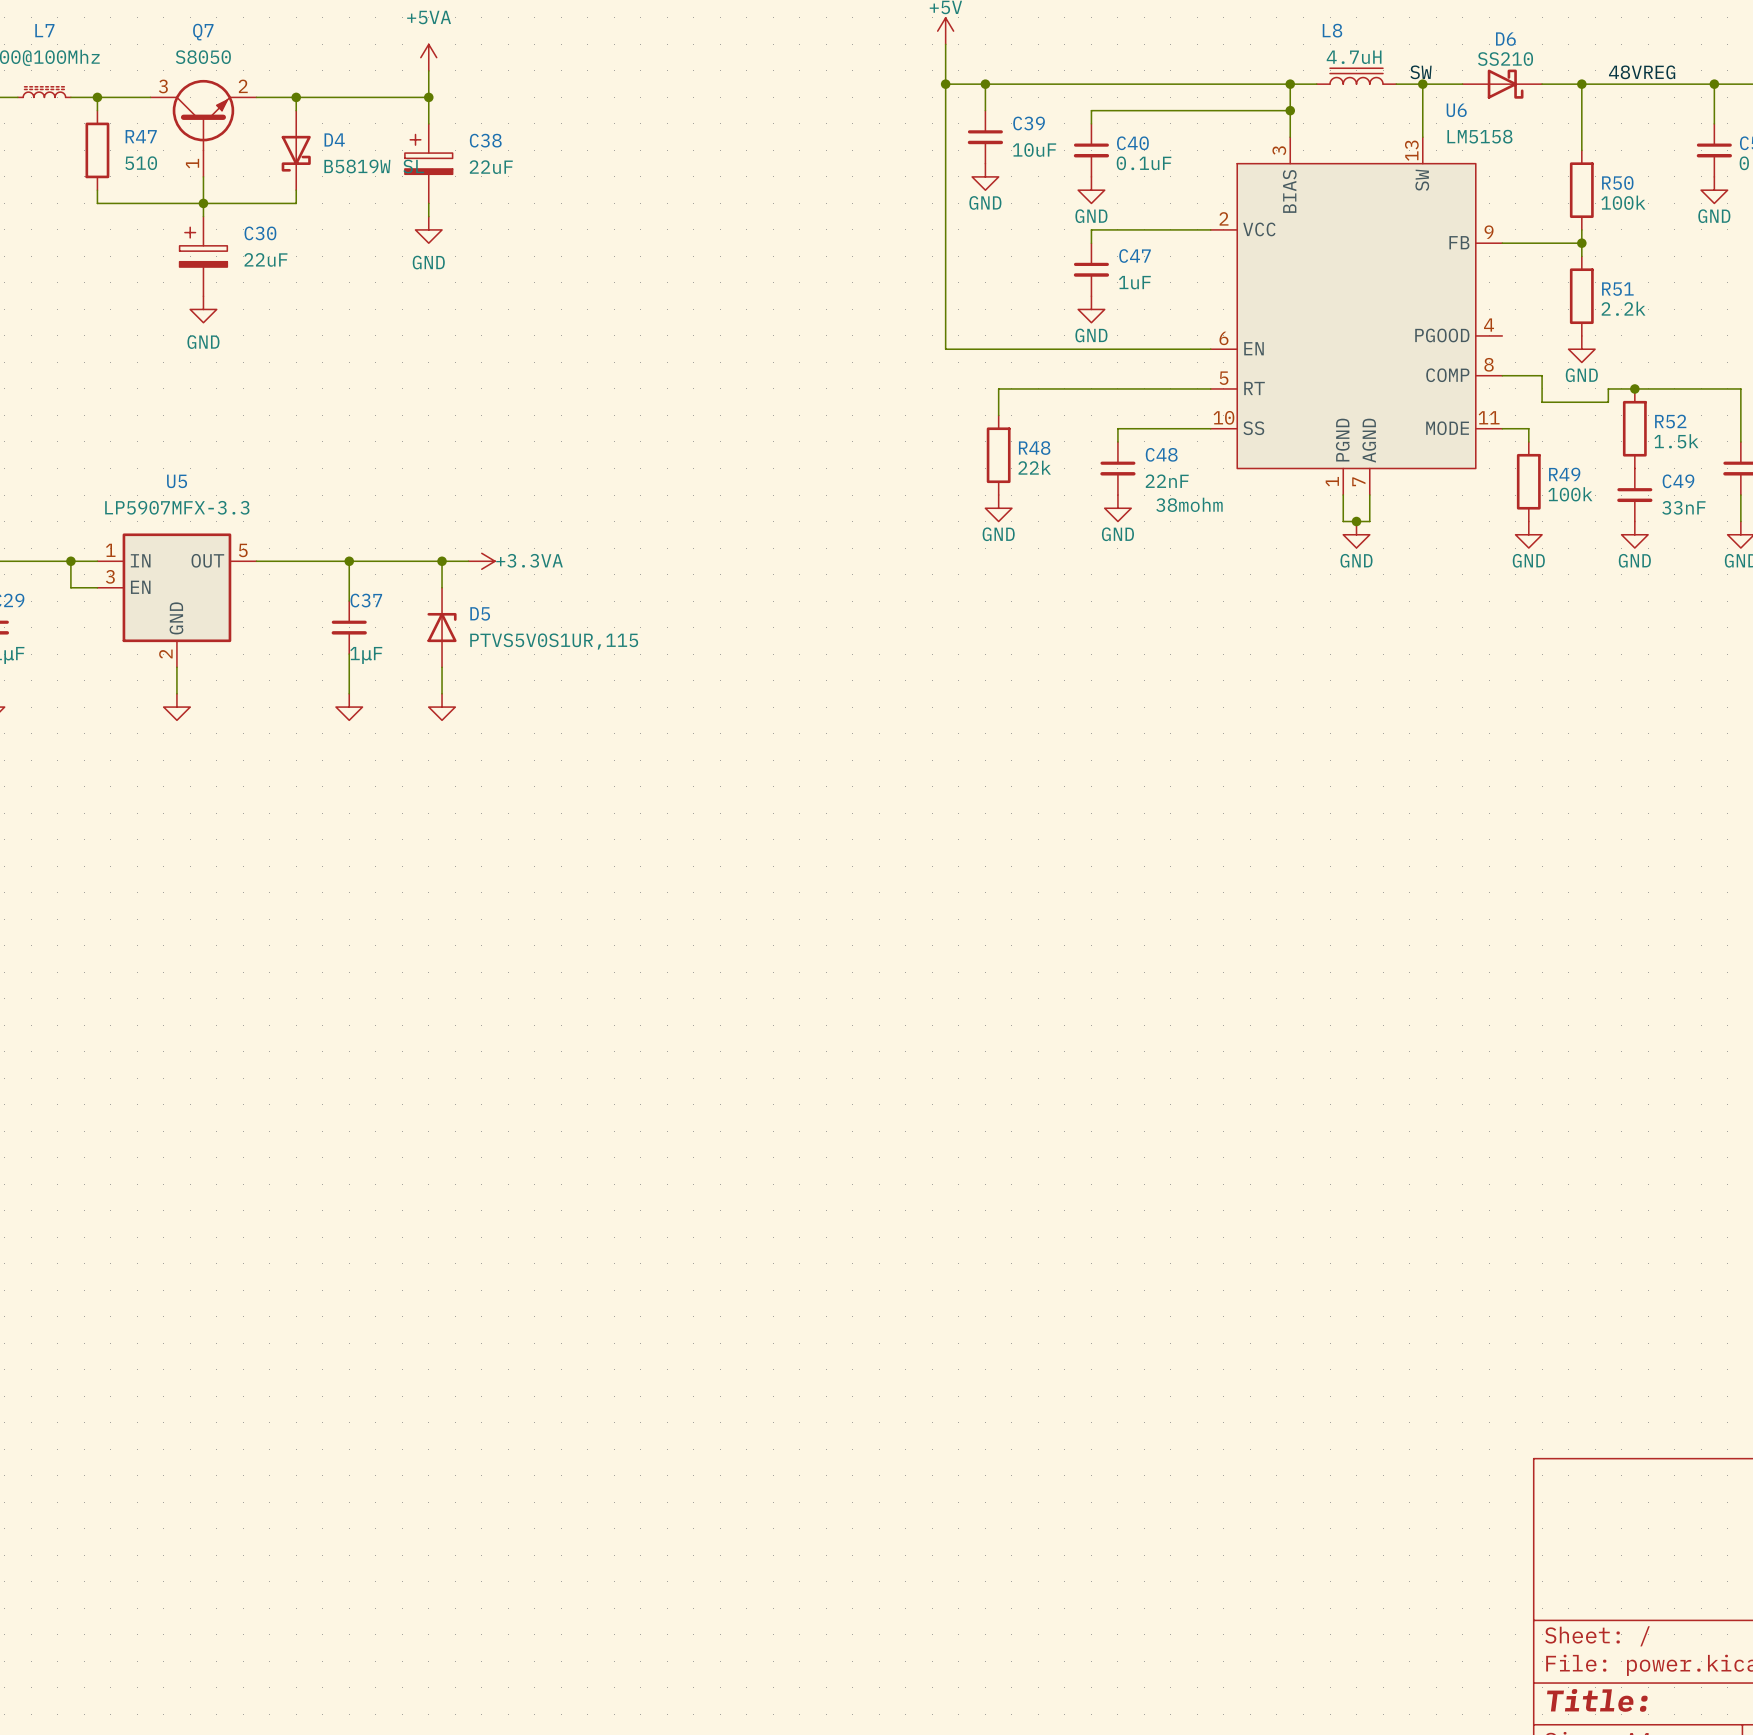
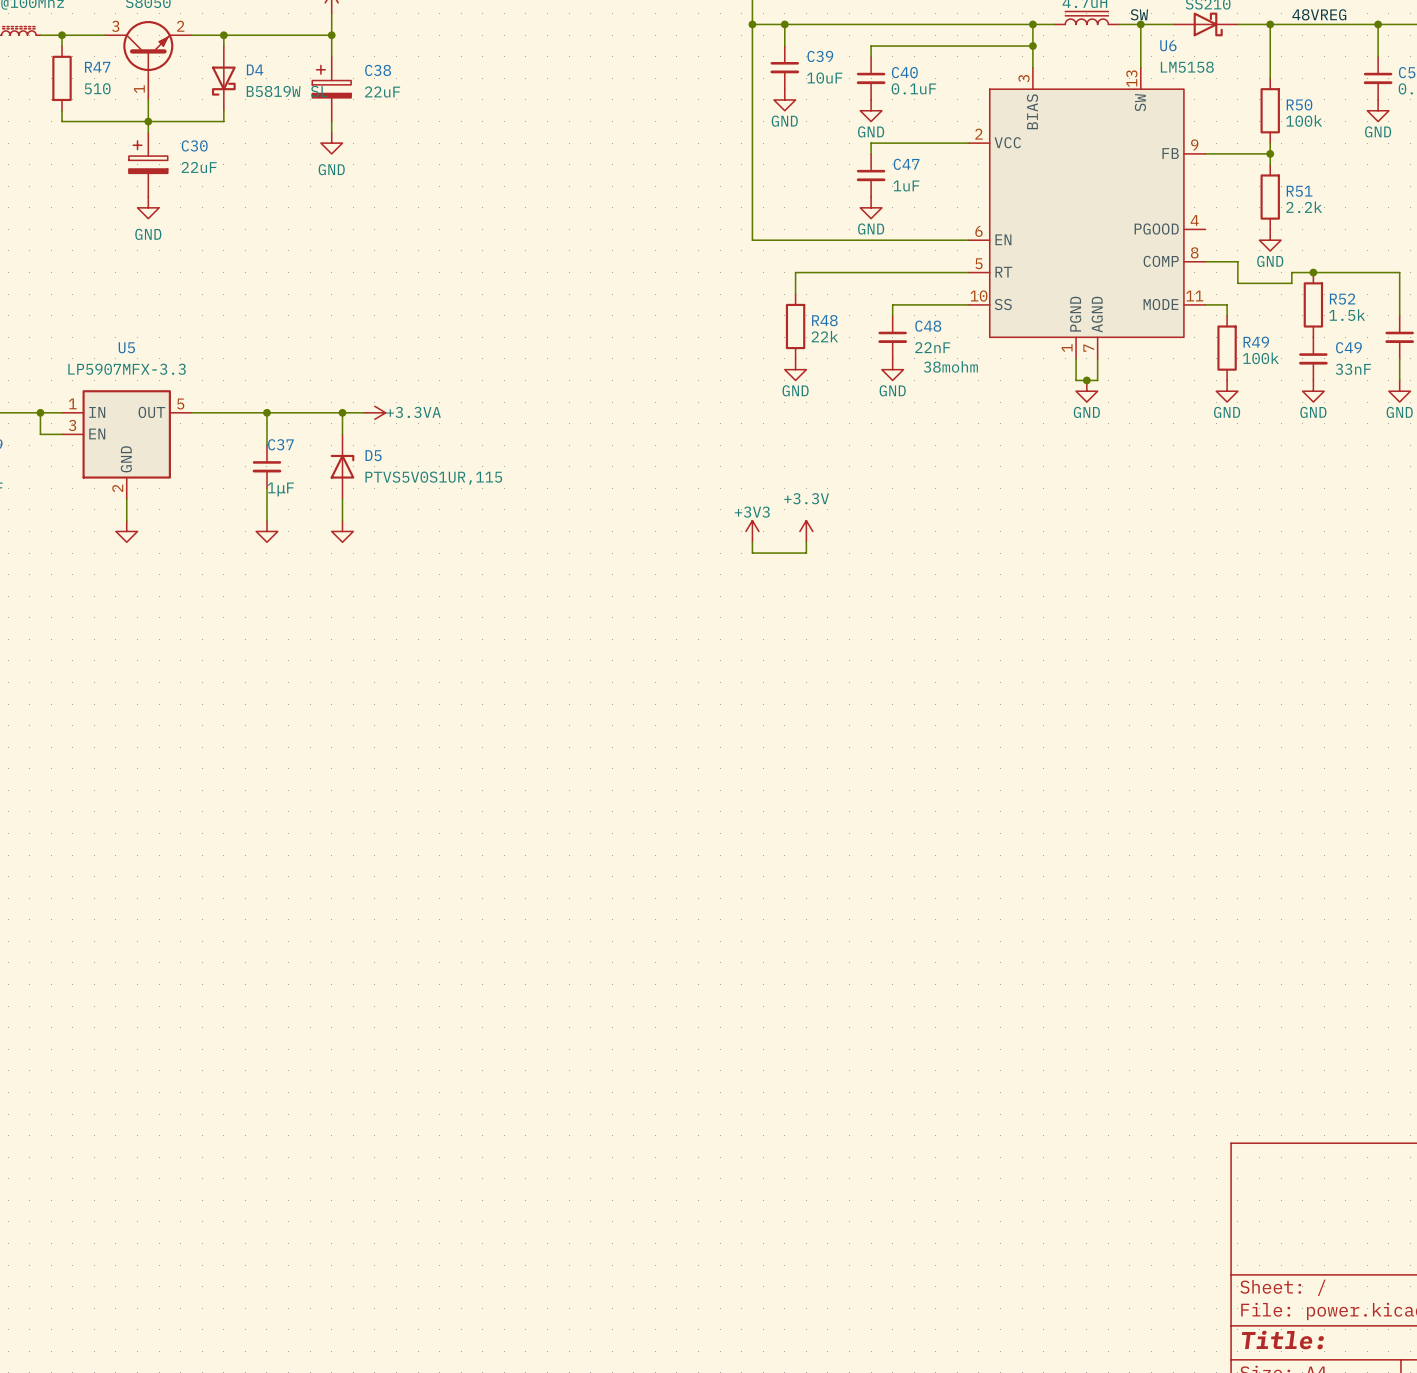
power symbol: none -> +3V3 (752, 531)
power symbol: none -> +3.3V (806, 531)
wire: none -> (752, 542) (752, 553) (806, 553) (806, 542)

